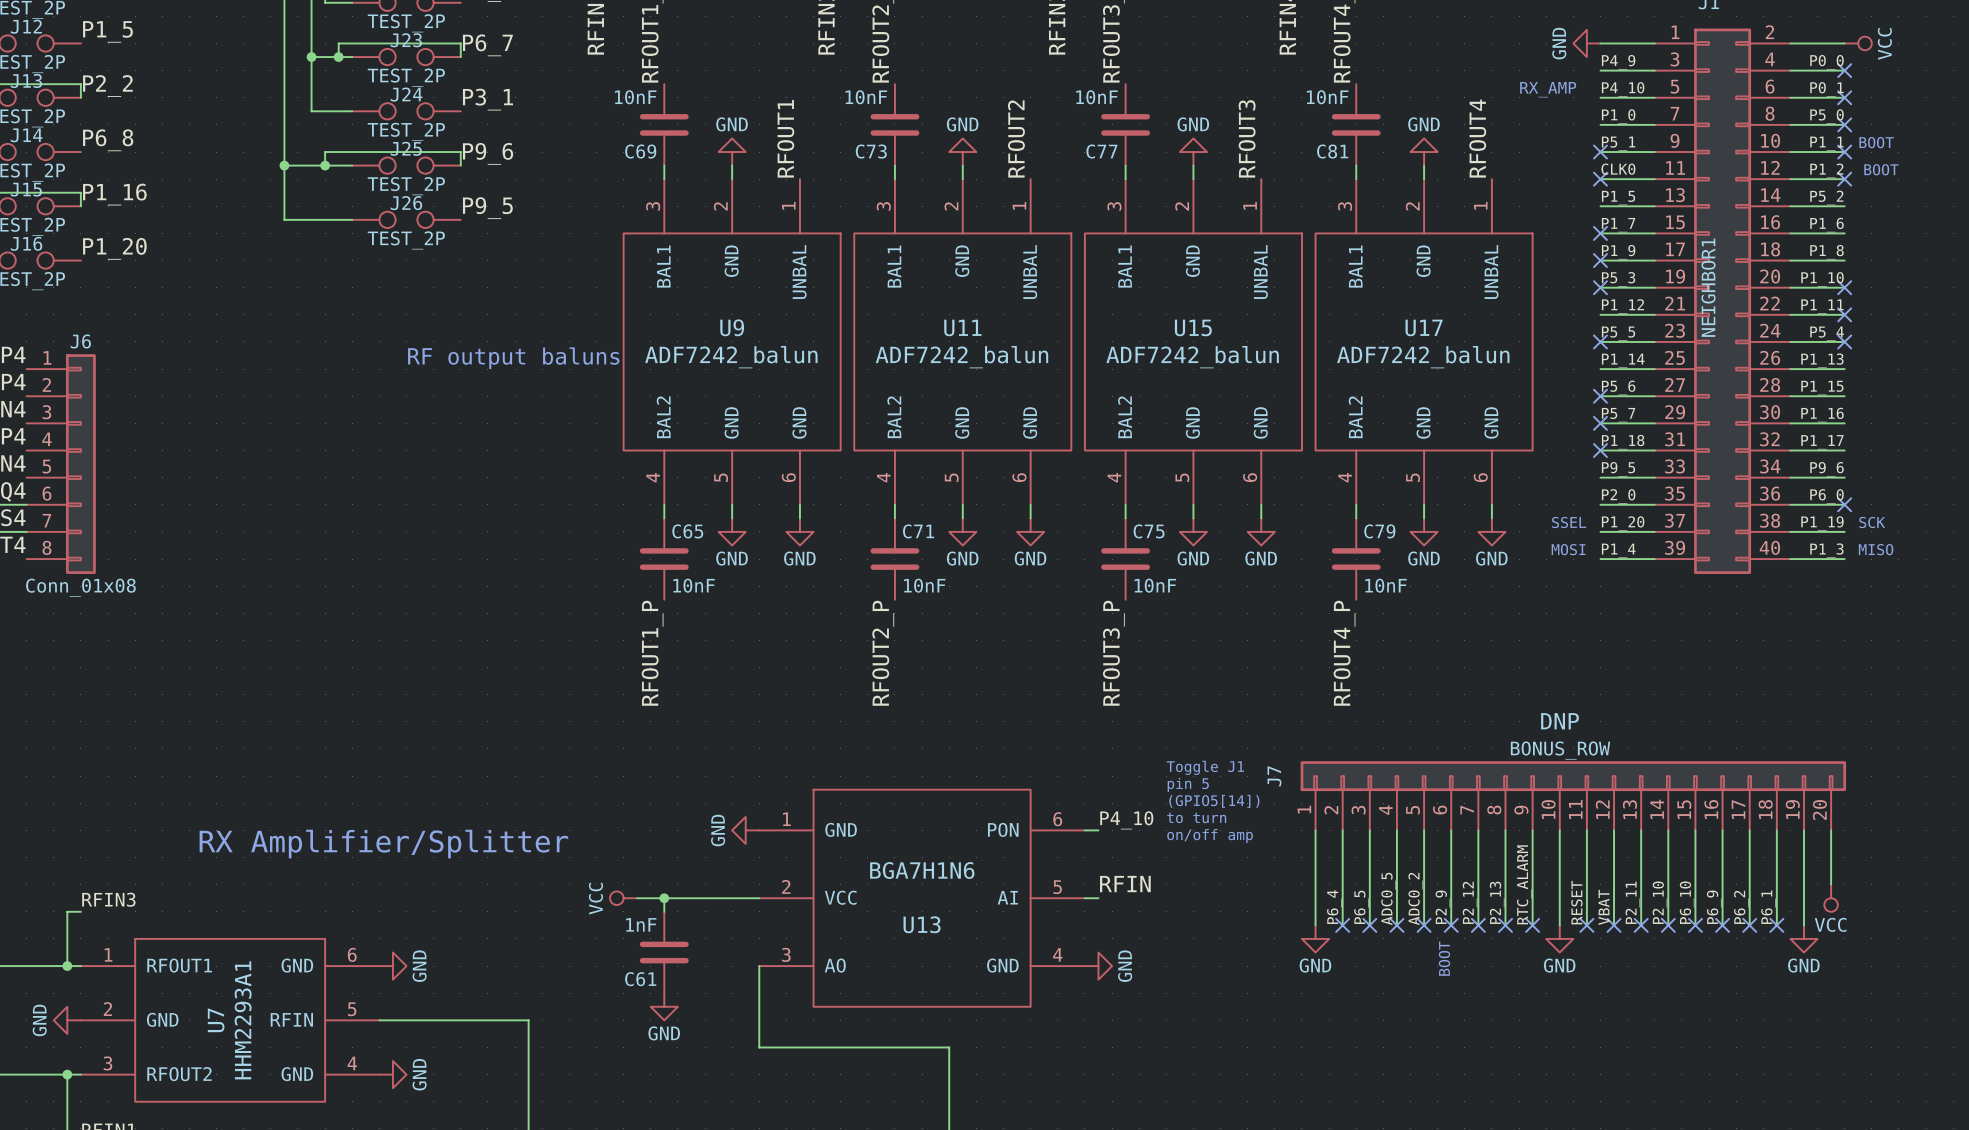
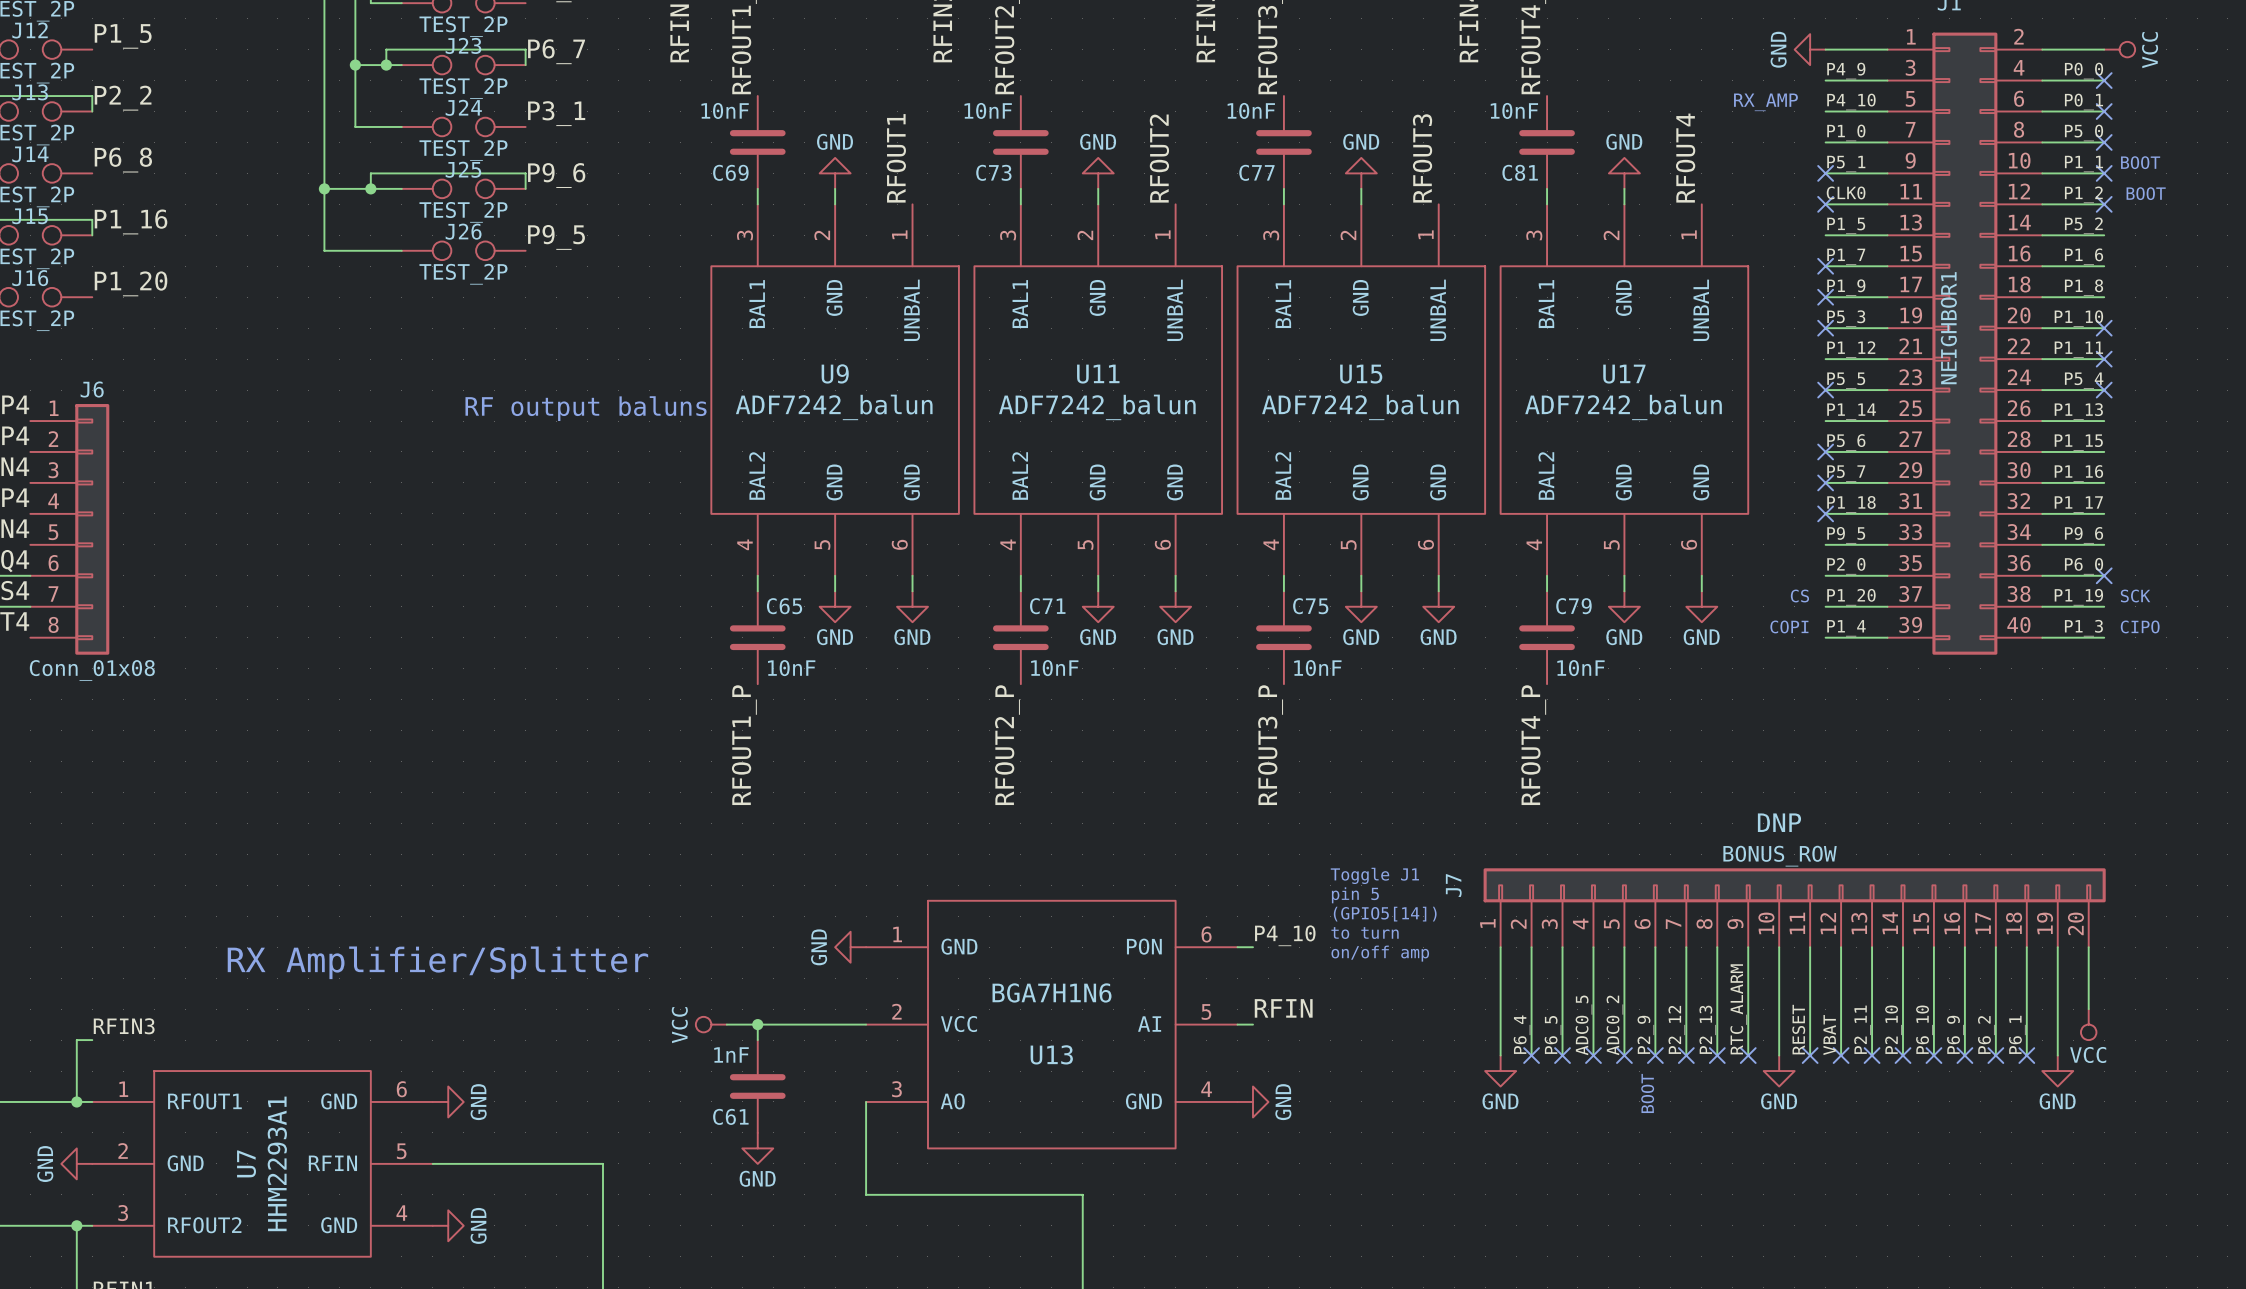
text: SSEL (1569, 522) -> CS (1799, 596)
text: MOSI (1568, 549) -> COPI (1789, 626)
text: MISO (1876, 549) -> CIPO (2140, 626)

